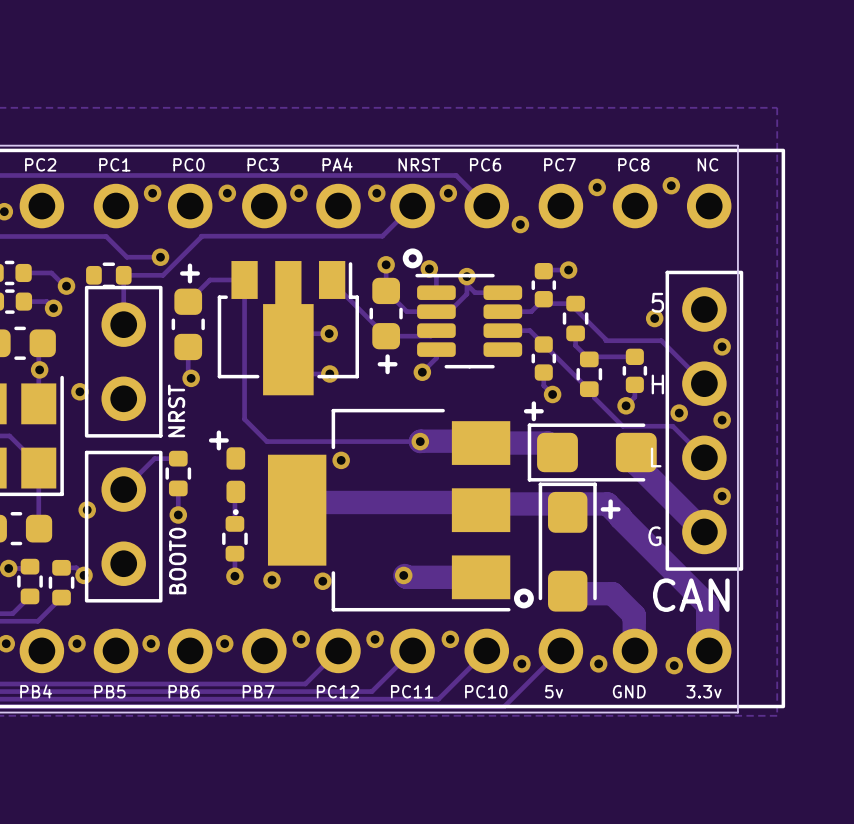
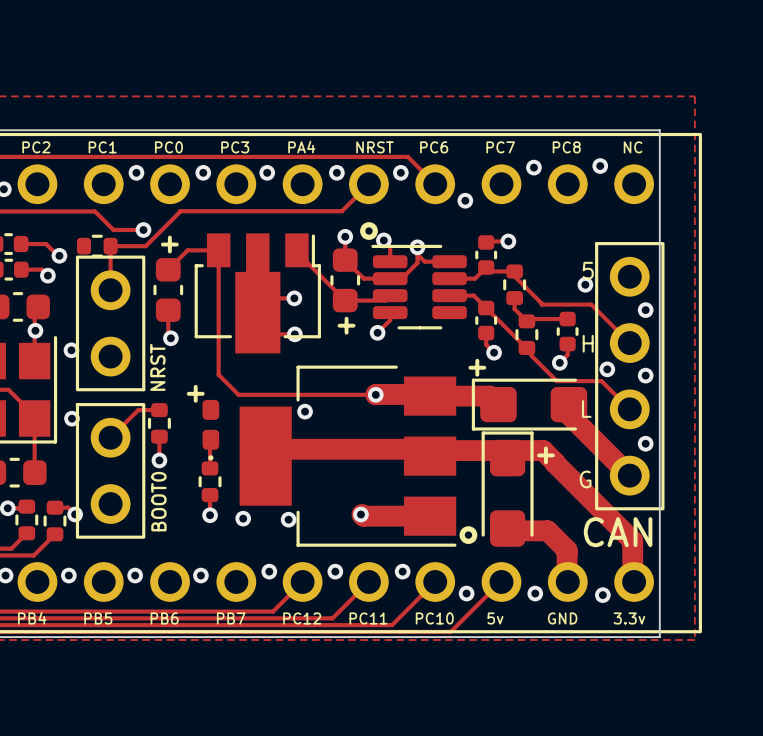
via position: (87, 510) -> (71, 418)

